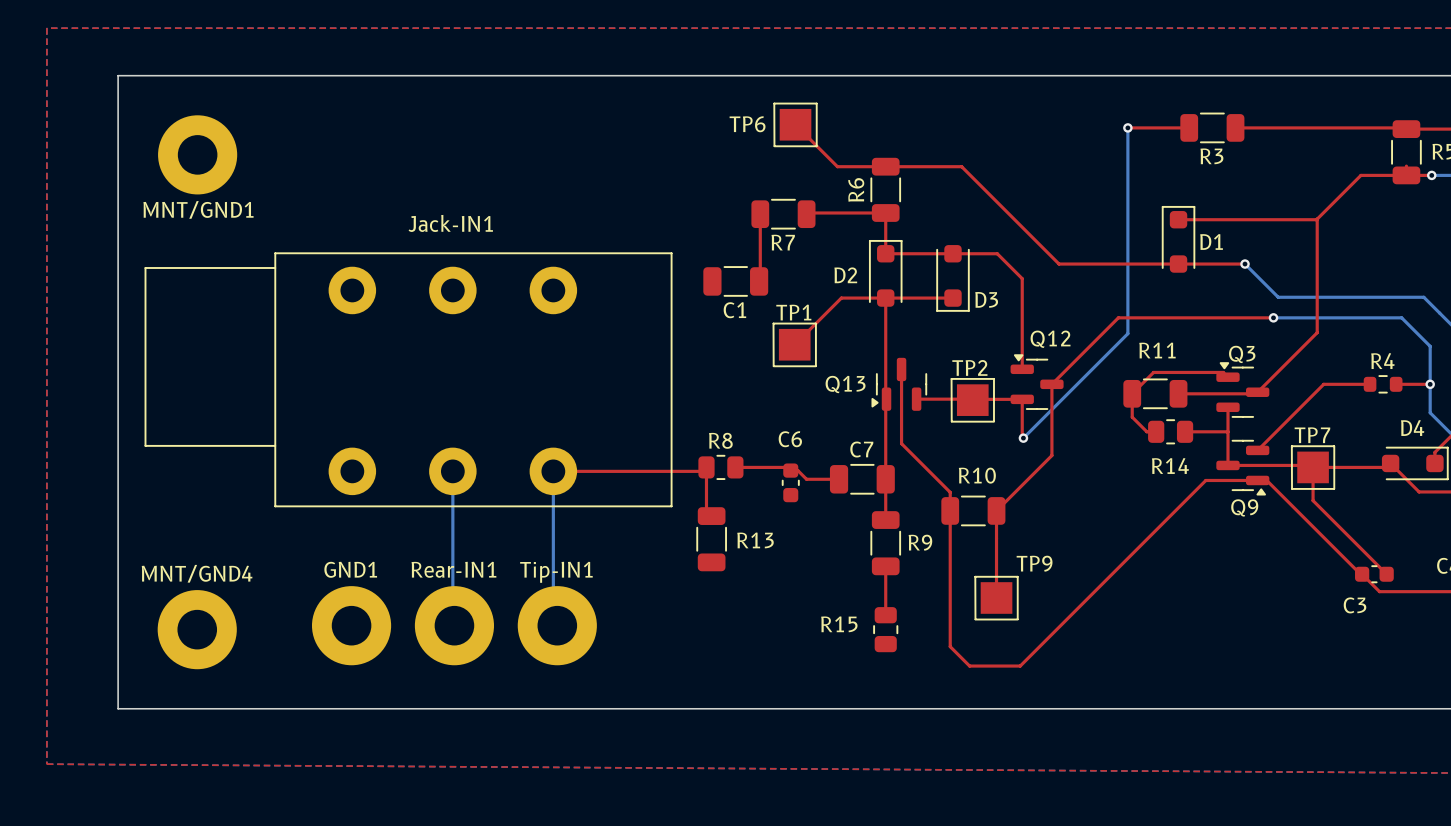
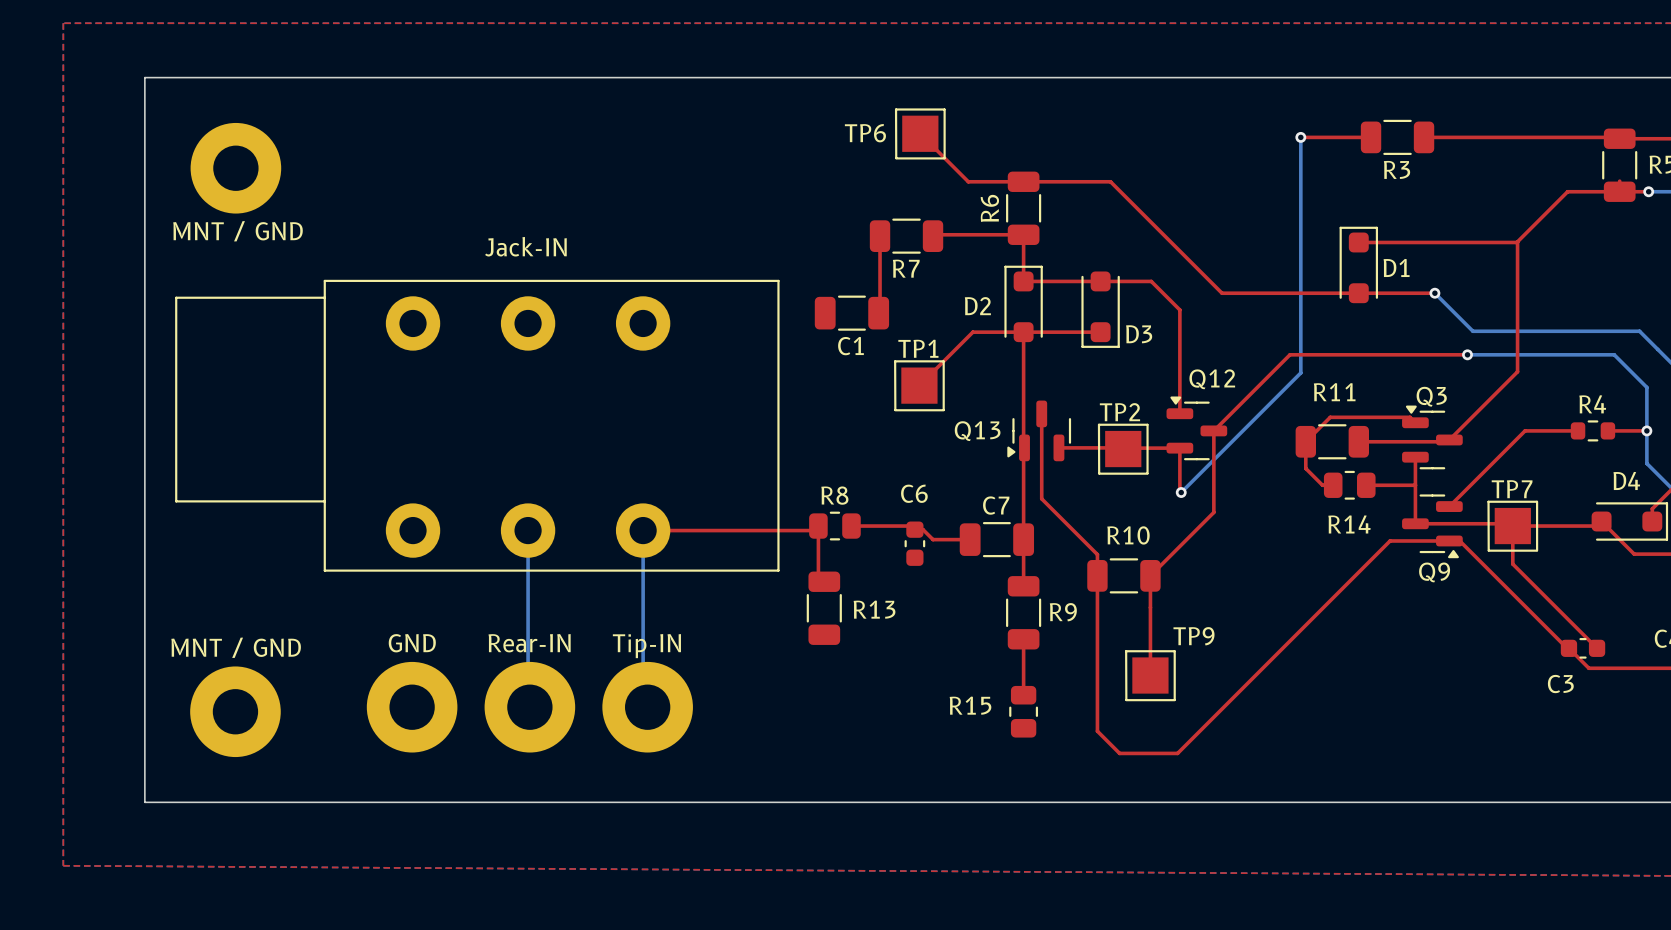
MNT/GND1 name: MNT/GND1 (198, 209) -> MNT / GND (238, 231)
Jack-IN1 name: Jack-IN1 (450, 223) -> Jack-IN (525, 246)
GND1 name: GND1 (350, 569) -> GND (412, 643)
Rear-IN1 name: Rear-IN1 (453, 569) -> Rear-IN (529, 643)
Tip-IN1 name: Tip-IN1 (556, 572) -> Tip-IN (646, 646)
MNT/GND4 name: MNT/GND4 (197, 573) -> MNT / GND (236, 647)

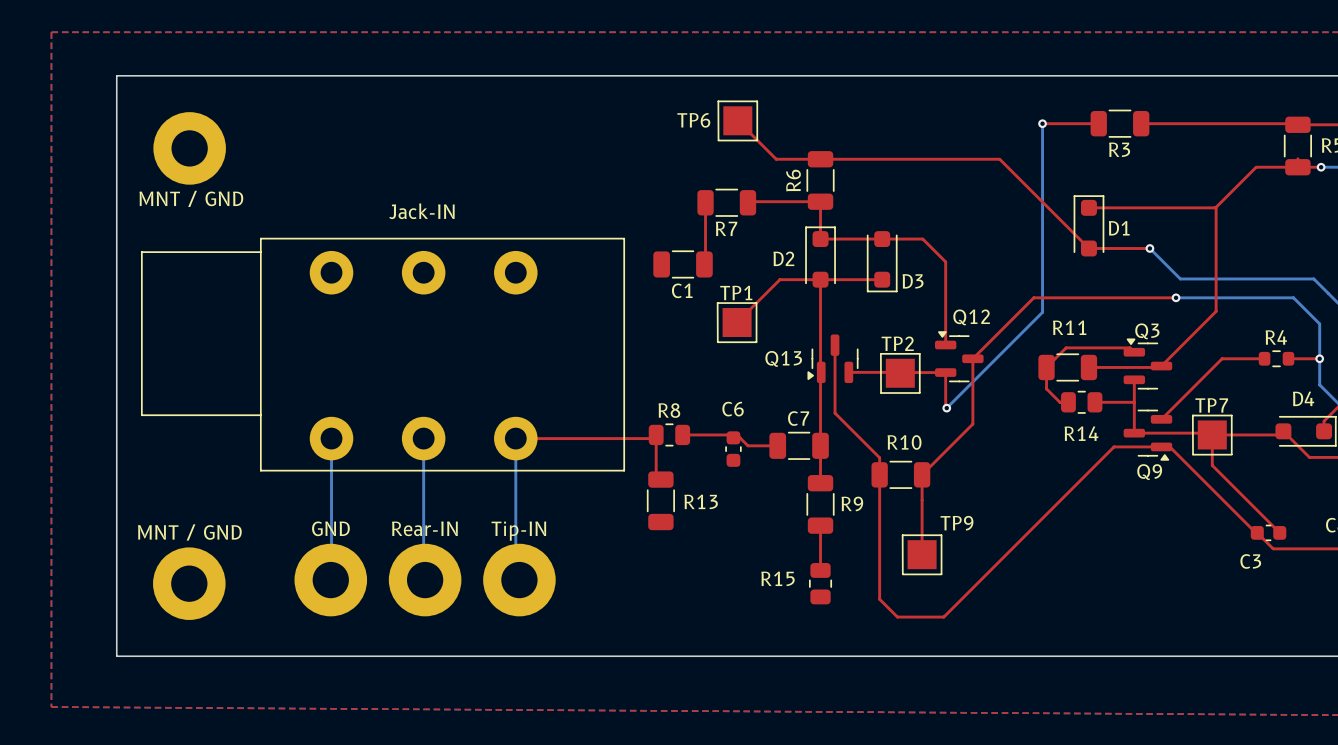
top track: (1110, 181) (1222, 293) (1358, 293) -> (890, 159) (999, 159) (1088, 248)
bottom track: none -> (331, 438) (331, 579)

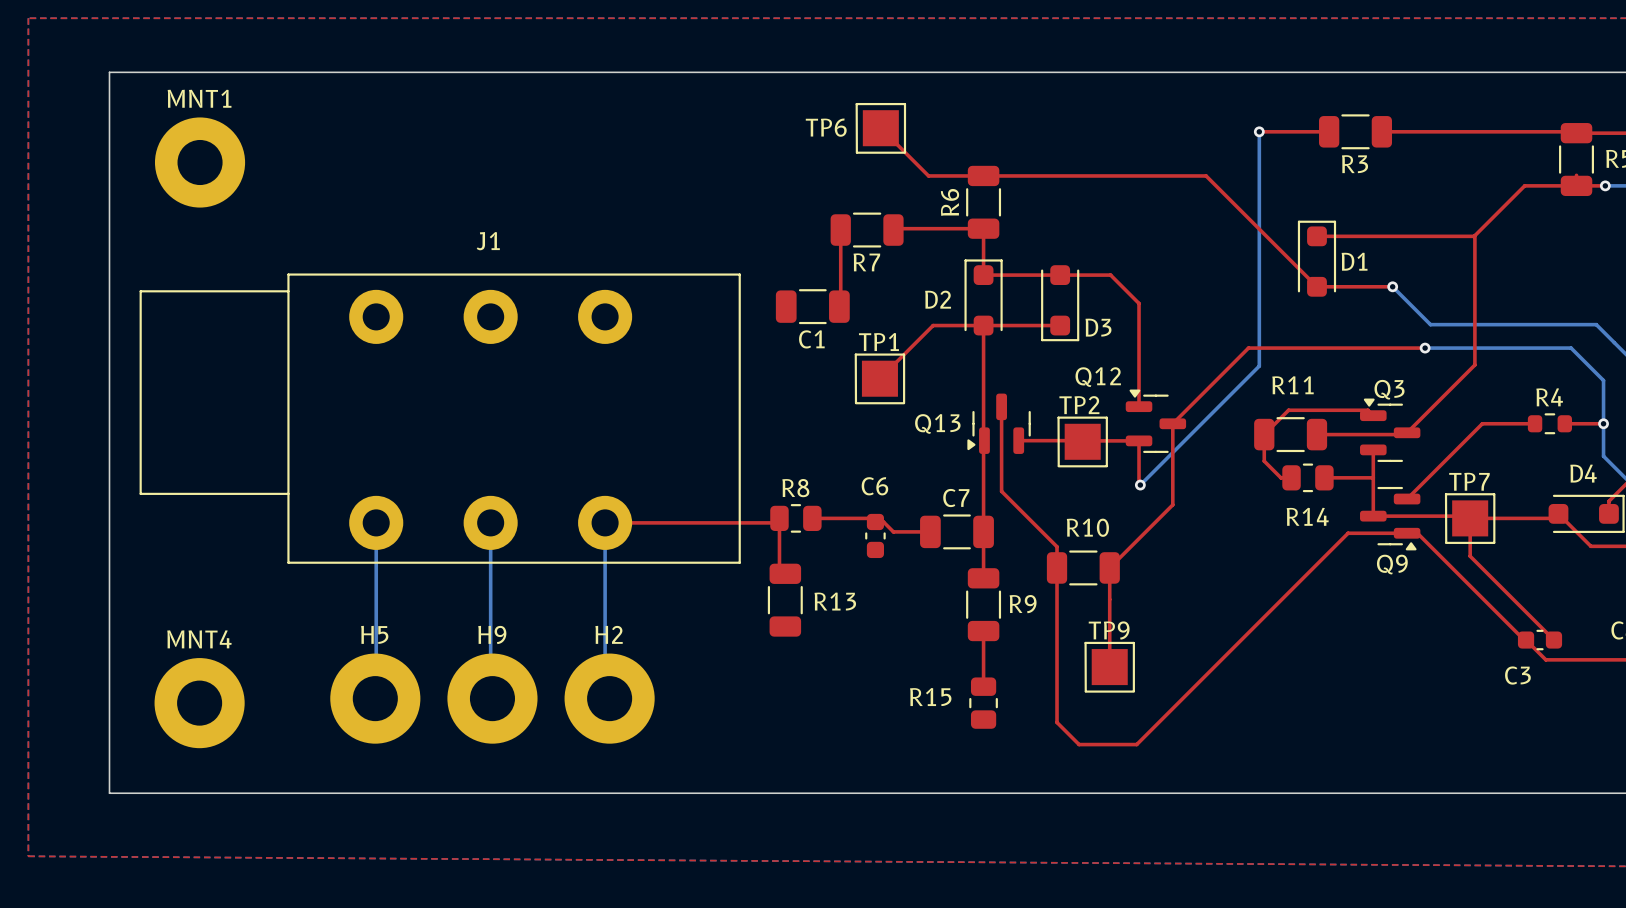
MNT / GND name: MNT / GND (191, 198) -> MNT1 (199, 98)
Jack-IN name: Jack-IN (421, 211) -> J1 (488, 241)
Q12 name position: Q12 (971, 317) -> Q12 (1098, 377)
TP9 name position: TP9 (956, 523) -> TP9 (1109, 630)
GND name: GND (330, 528) -> H5 (374, 634)
Rear-IN name: Rear-IN (424, 528) -> H9 (492, 634)
Tip-IN name: Tip-IN (518, 531) -> H2 (609, 634)
MNT / GND name: MNT / GND (189, 532) -> MNT4 (199, 639)

